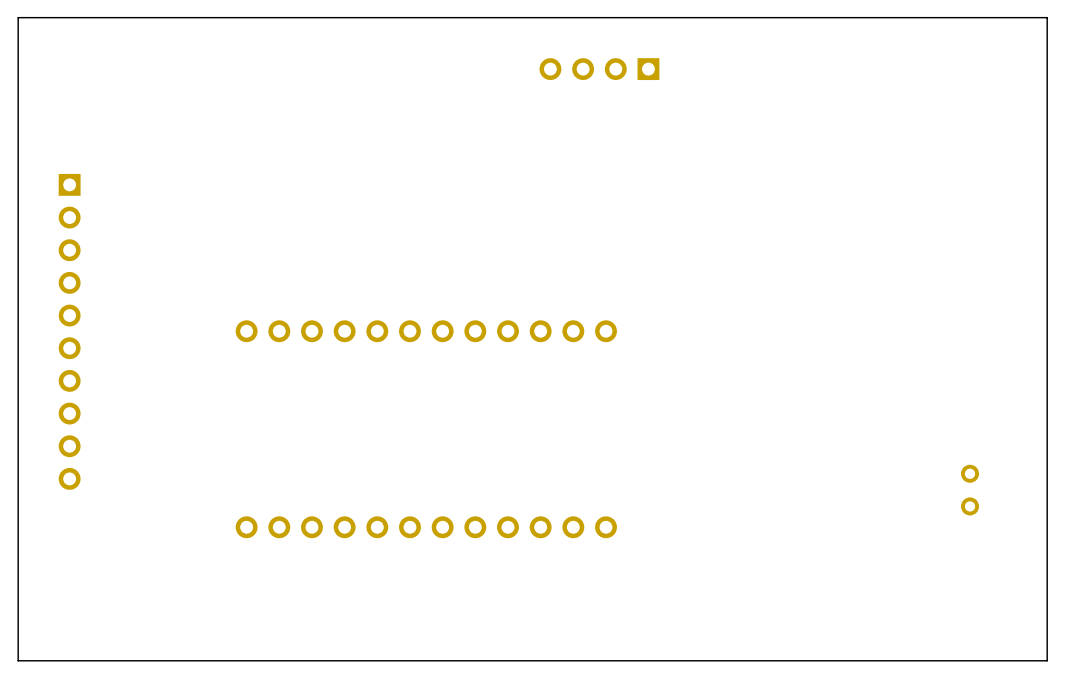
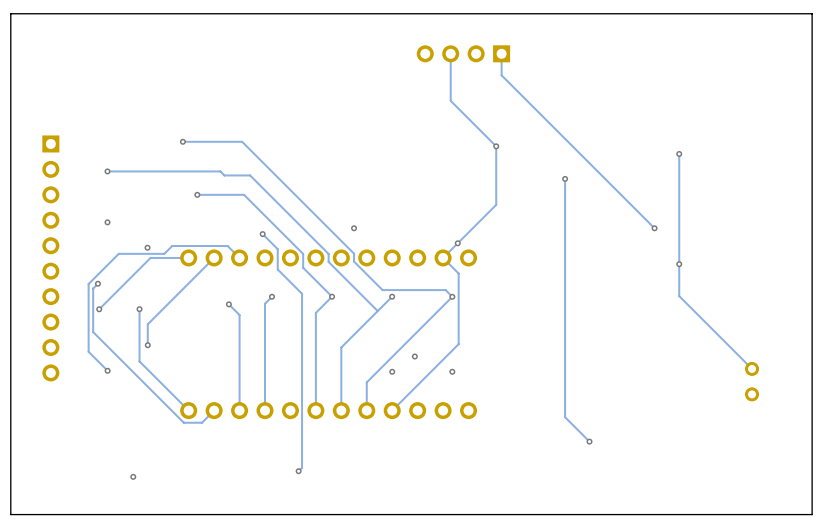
track: none -> (450, 53) (450, 100) (496, 146) (496, 204) (443, 257) (458, 273) (458, 344) (392, 410)
track: none -> (501, 53) (501, 75) (654, 228)
track: none -> (182, 141) (242, 141) (354, 253) (354, 261) (382, 290) (445, 290) (452, 296) (366, 382) (366, 410)
via: none -> (182, 141)
via: none -> (496, 146)
track: none -> (679, 153) (679, 296) (752, 368)
via: none -> (679, 153)
track: none -> (107, 171) (220, 171) (224, 175) (250, 175) (328, 253) (328, 261) (377, 311)
via: none -> (107, 171)
track: none -> (565, 178) (565, 417) (589, 441)
via: none -> (565, 178)
track: none -> (197, 194) (244, 194) (303, 253) (303, 267) (332, 296) (315, 312) (315, 410)
via: none -> (197, 194)
via: none -> (107, 222)
via: none -> (354, 228)
via: none -> (654, 228)
track: none -> (262, 234) (277, 249) (277, 269) (302, 293) (302, 467) (298, 471)
via: none -> (262, 234)
via: none -> (457, 243)
via: none -> (147, 247)
track: none -> (188, 257) (150, 257) (99, 309)
track: none -> (214, 257) (147, 324) (147, 345)
track: none -> (239, 257) (227, 246) (172, 246) (164, 253) (118, 253) (88, 284) (88, 351) (107, 370)
via: none -> (679, 264)
track: none -> (97, 283) (93, 288) (93, 332) (183, 422) (201, 422) (214, 410)
via: none -> (97, 283)
track: none -> (392, 296) (341, 347) (341, 410)
via: none -> (392, 296)
track: none -> (272, 296) (265, 303) (265, 410)
via: none -> (272, 296)
via: none -> (332, 296)
via: none -> (452, 296)
track: none -> (228, 304) (239, 315) (239, 410)
via: none -> (228, 304)
via: none -> (99, 309)
track: none -> (139, 309) (139, 361) (188, 410)
via: none -> (139, 309)
via: none -> (147, 345)
via: none -> (414, 356)
via: none -> (107, 370)
via: none -> (392, 371)
via: none -> (452, 371)
via: none -> (589, 441)
via: none -> (298, 471)
via: none -> (133, 476)

